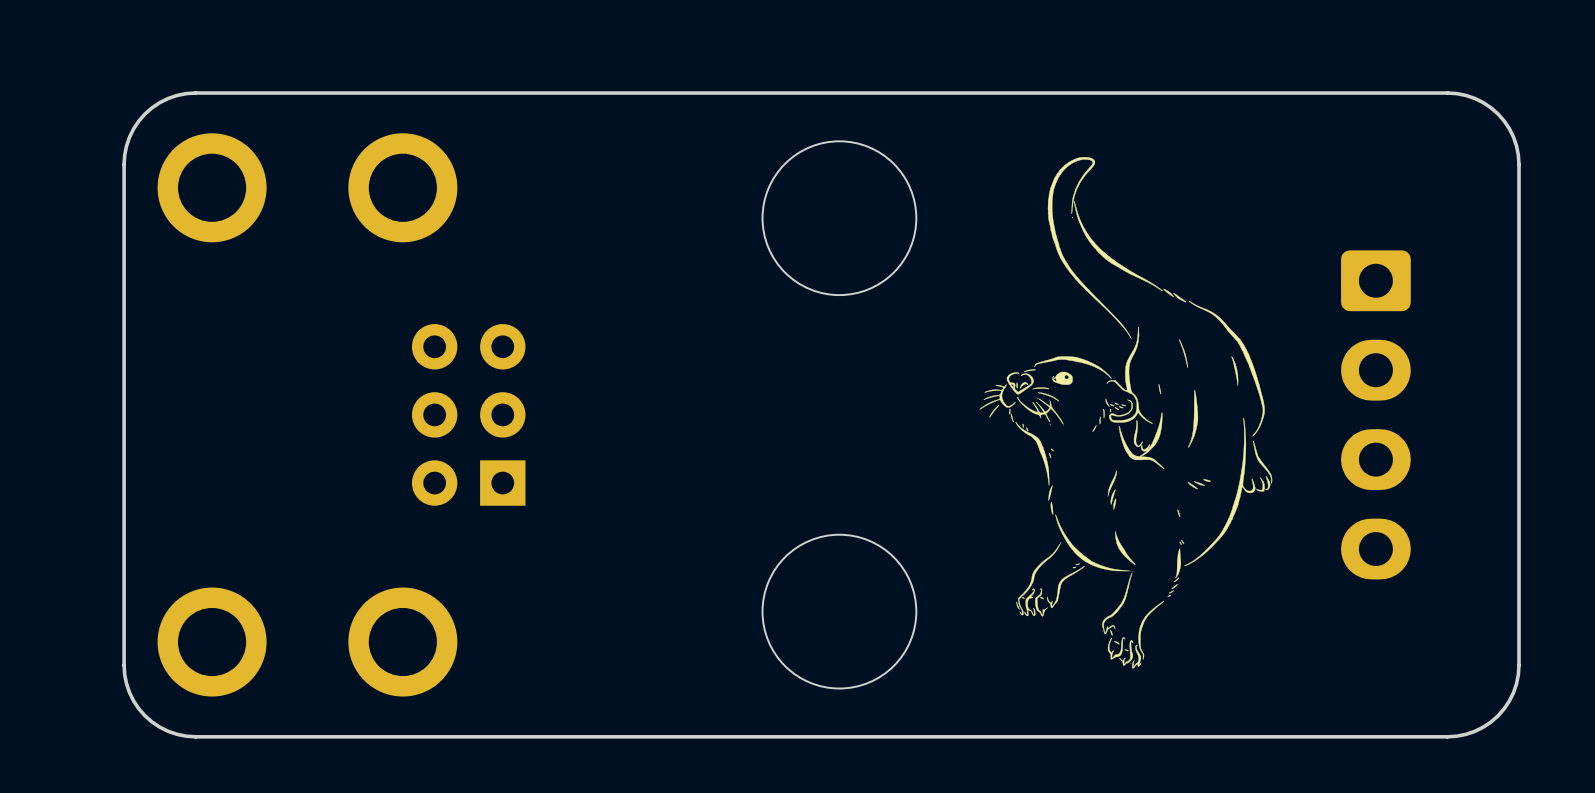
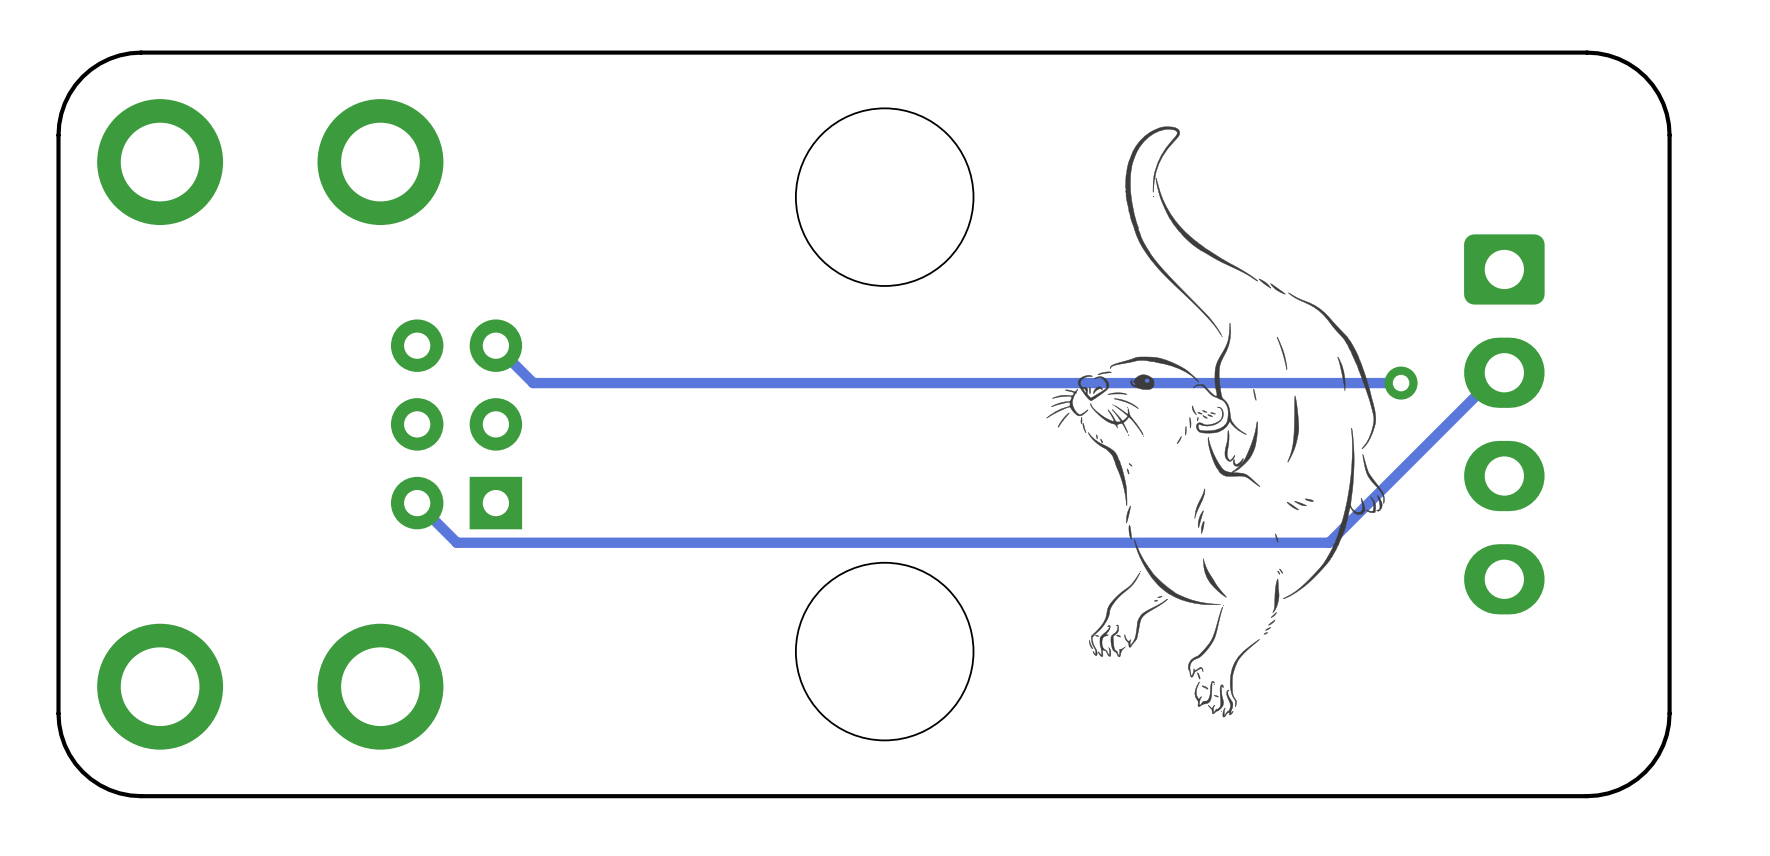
track: none -> (495, 345) (533, 383) (1401, 383)
track: none -> (1504, 372) (1499, 372) (1329, 542) (456, 542) (417, 503)
via: none -> (1401, 383)

